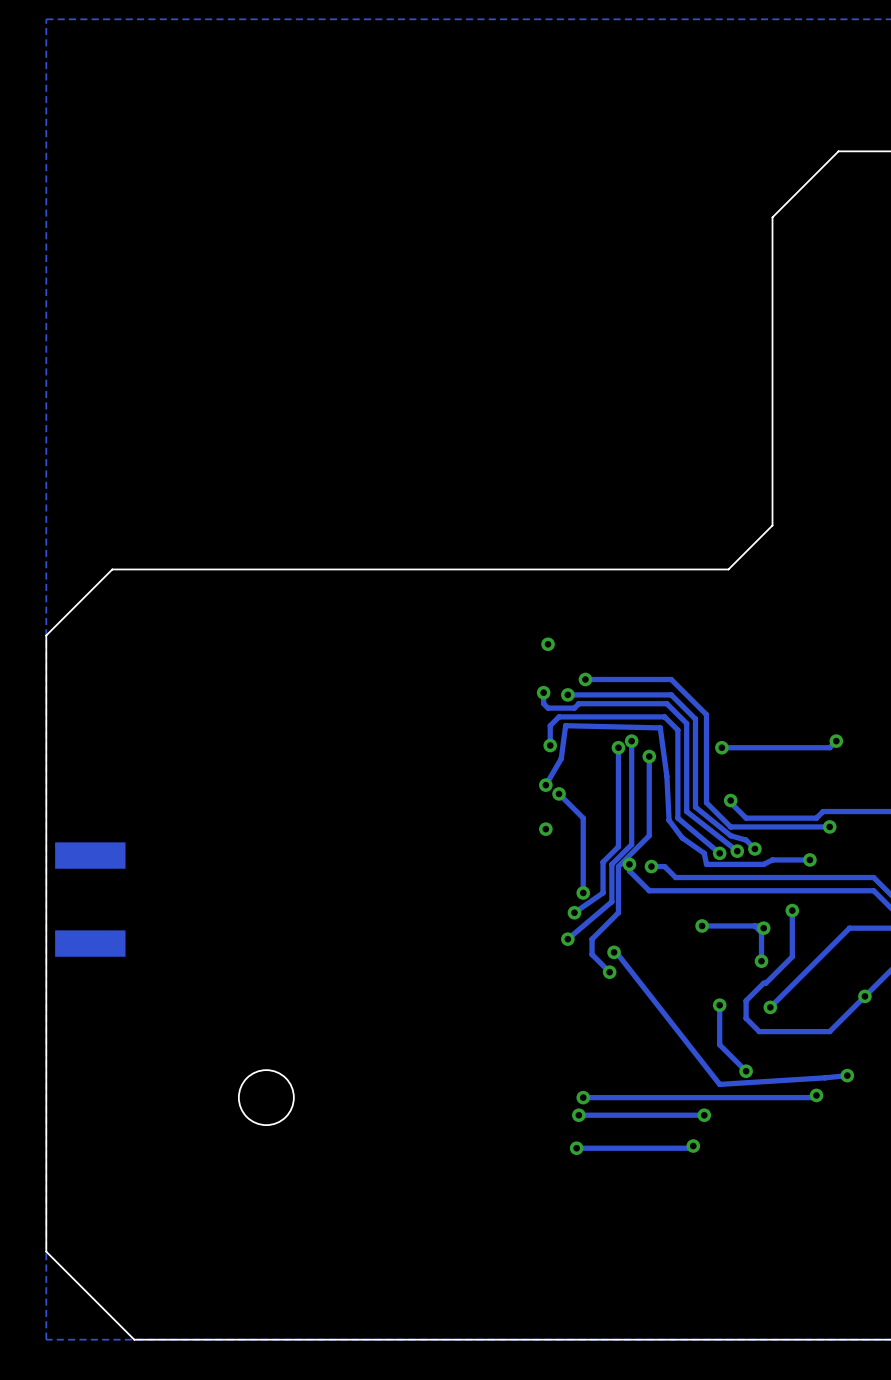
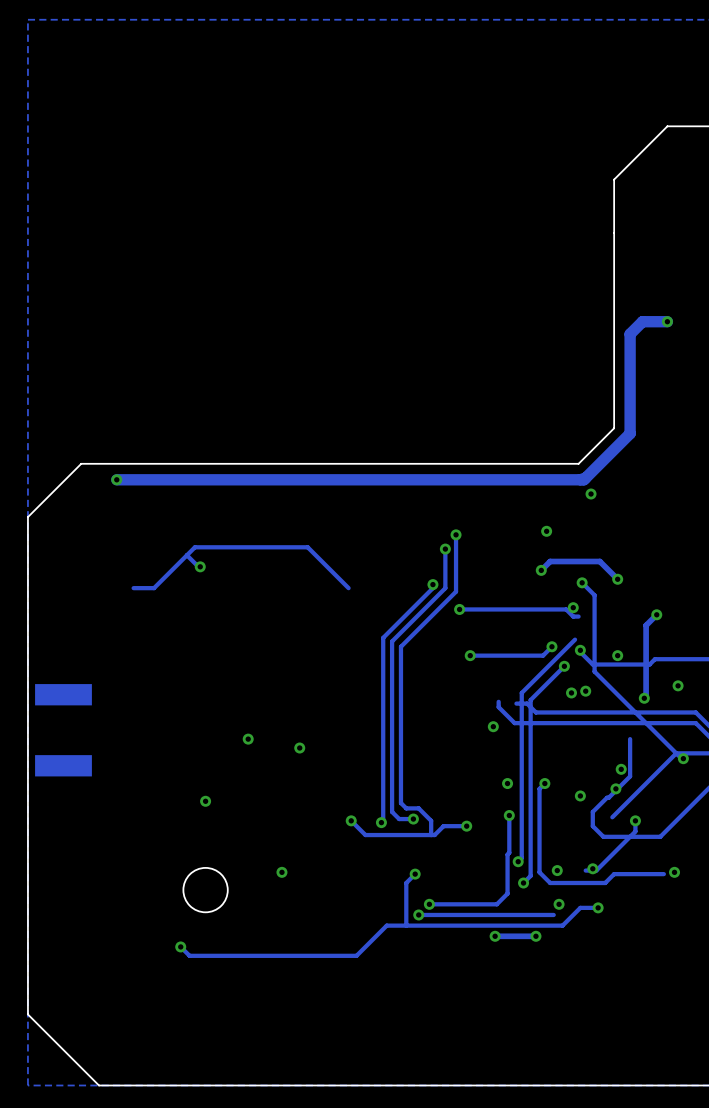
track: none -> (667, 321) (642, 321) (630, 334) (630, 433) (583, 479)
via: none -> (667, 321)
via: none -> (116, 479)
track: none -> (583, 479) (116, 479)
via: none -> (591, 494)
via: (548, 644) -> none
via: none -> (546, 531)
track: none -> (456, 534) (456, 591) (400, 646) (400, 803) (406, 808) (418, 808) (431, 820) (431, 835)
via: none -> (456, 534)
track: none -> (445, 549) (445, 588) (392, 641) (392, 811) (399, 819) (413, 819)
via: none -> (445, 549)
track: (585, 679) (671, 679) (706, 714) (706, 802) (730, 826) (829, 826) -> none
via: (585, 679) -> none
track: none -> (186, 555) (200, 566)
track: (543, 692) (543, 703) (548, 708) (574, 708) (578, 703) (666, 703) (686, 723) (686, 811) (737, 851) -> none
via: (543, 692) -> none
track: (567, 694) (671, 694) (695, 719) (695, 807) (730, 835) (746, 840) (754, 848) -> none
via: (567, 694) -> none
via: none -> (200, 566)
track: none -> (541, 570) (550, 561) (599, 561) (617, 579)
via: none -> (541, 570)
via: none -> (617, 579)
track: none -> (582, 582) (594, 595) (594, 671) (683, 758)
via: none -> (582, 582)
track: none -> (432, 584) (432, 588) (383, 637) (383, 820) (381, 822)
via: none -> (432, 584)
track: none -> (348, 588) (307, 547) (194, 547) (154, 588) (133, 588)
track: (631, 741) (631, 844) (611, 864) (611, 901) (567, 939) -> none
via: (631, 741) -> none
track: (836, 741) (829, 747) (721, 747) -> none
via position: (836, 741) -> (656, 614)
track: (550, 745) (550, 725) (559, 716) (664, 716) (677, 730) (677, 818) (719, 853) -> none
via: (550, 745) -> none
track: (618, 747) (618, 846) (603, 862) (603, 892) (574, 912) -> none
via: (618, 747) -> none
track: none -> (459, 609) (566, 609) (573, 616) (578, 616)
via: none -> (459, 609)
track: (649, 756) (649, 835) (618, 866) (618, 912) (592, 939) (592, 954) (609, 972) -> none
via: (649, 756) -> none
track: none -> (656, 614) (646, 625) (646, 696)
track: (545, 785) (561, 758) (565, 725) (660, 727) (666, 776) (669, 820) (682, 837) (704, 853) (706, 864) (763, 864) (772, 859) (809, 859) -> none
via: (545, 785) -> none
track: none -> (575, 639) (521, 692) (521, 858) (518, 861)
track: (559, 793) (583, 818) (583, 892) -> none
via: (559, 793) -> none
track: none -> (551, 646) (543, 655) (470, 655)
via: none -> (551, 646)
via: none -> (470, 655)
via: none -> (617, 655)
track: none -> (564, 666) (530, 700) (530, 875) (523, 883)
via: none -> (564, 666)
via: (829, 826) -> none
via: (545, 829) -> none
via: none -> (678, 685)
via: (754, 848) -> none
via: (629, 864) -> none
via: (651, 866) -> none
via: (583, 892) -> none
via: none -> (493, 726)
via: none -> (248, 739)
via: (792, 910) -> none
via: (574, 912) -> none
via: none -> (299, 748)
track: (702, 925) (761, 925) (763, 928) -> none
via: (702, 925) -> none
track: (754, 925) (761, 932) (761, 961) -> none
via: (763, 928) -> none
via: none -> (683, 758)
via: (567, 939) -> none
via: none -> (621, 769)
track: (614, 952) (616, 952) (719, 1084) (847, 1075) -> none
via: (614, 952) -> none
via position: (761, 961) -> (615, 788)
via: none -> (507, 783)
track: none -> (544, 783) (539, 788) (539, 872) (550, 883) (605, 883) (614, 874) (663, 874)
via: none -> (544, 783)
via: (609, 972) -> none
via: none -> (580, 795)
via: none -> (205, 801)
via: (864, 996) -> none
via: none -> (509, 815)
track: (719, 1005) (719, 1044) (746, 1071) -> none
via: (719, 1005) -> none
via: (770, 1007) -> none
via: none -> (413, 819)
track: none -> (351, 820) (365, 835) (434, 835) (443, 826) (466, 826)
via: none -> (351, 820)
track: none -> (635, 820) (635, 831) (596, 870) (585, 870)
via: none -> (635, 820)
via: none -> (381, 822)
via: none -> (466, 826)
via: none -> (518, 861)
via: none -> (557, 870)
via: none -> (281, 872)
track: none -> (415, 874) (406, 883) (406, 925)
via: none -> (415, 874)
via: none -> (523, 883)
track: (816, 1095) (814, 1097) (583, 1097) -> none
via: (816, 1095) -> none
via: (583, 1097) -> none
via: none -> (429, 904)
track: none -> (457, 904) (429, 904)
via: (578, 1115) -> none
track: (704, 1115) (627, 1115) -> (509, 815) (507, 893) (496, 904)
track: none -> (598, 907) (580, 907) (562, 925) (386, 925) (356, 955) (189, 955) (180, 946)
via: none -> (598, 907)
via: none -> (418, 914)
track: none -> (553, 914) (418, 914)
track: (693, 1146) (691, 1148) (576, 1148) -> none
via position: (693, 1146) -> (535, 936)
via: (576, 1148) -> none
via: none -> (495, 936)
track: none -> (535, 936) (495, 936)
via: none -> (180, 946)

